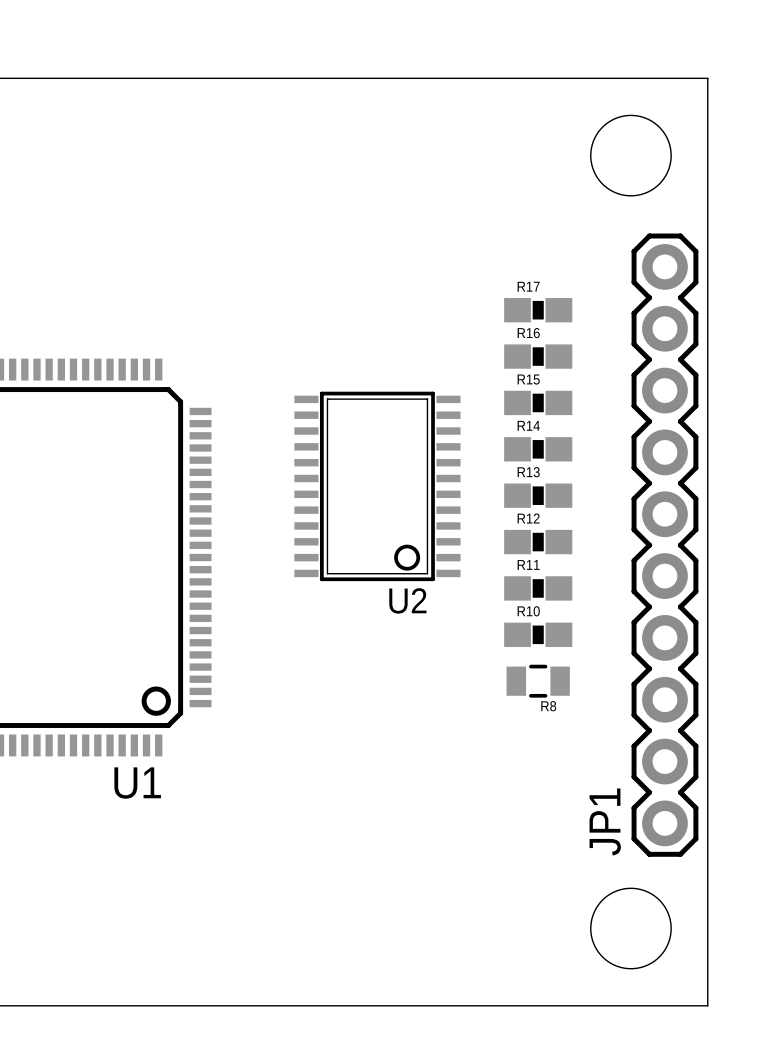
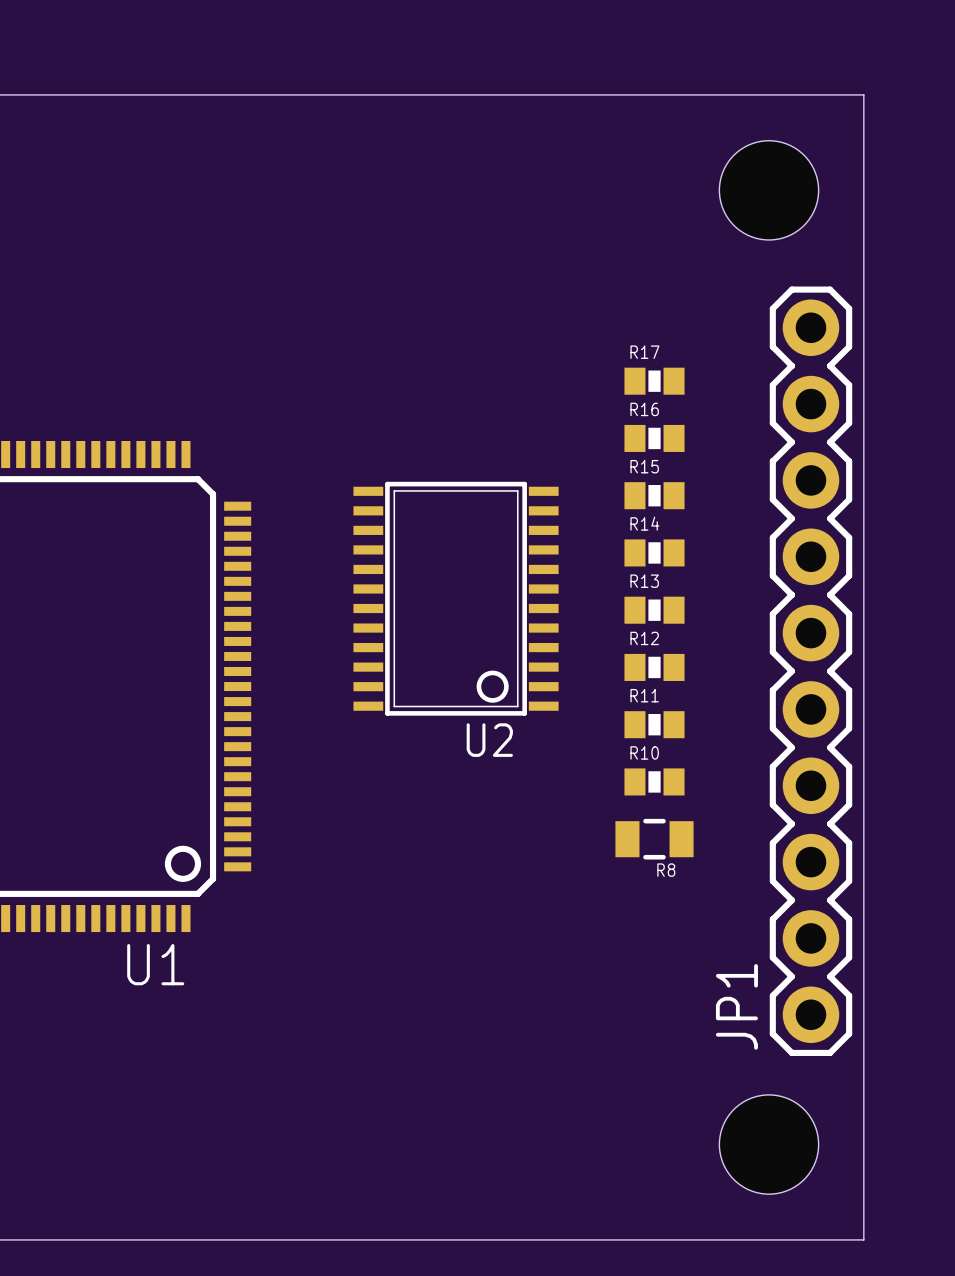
R17 footprint: [504, 298, 573, 323] -> [624, 367, 685, 395]
R16 footprint: [504, 344, 573, 369] -> [624, 424, 685, 452]
R15 footprint: [504, 390, 573, 416] -> [624, 482, 685, 510]
R14 footprint: [504, 437, 573, 462] -> [624, 539, 685, 567]
R13 footprint: [504, 483, 573, 508] -> [624, 596, 685, 624]
R12 footprint: [504, 529, 573, 555] -> [624, 653, 685, 681]
R11 footprint: [504, 576, 573, 601] -> [624, 711, 685, 739]
R10 footprint: [504, 622, 573, 647] -> [624, 768, 685, 796]

